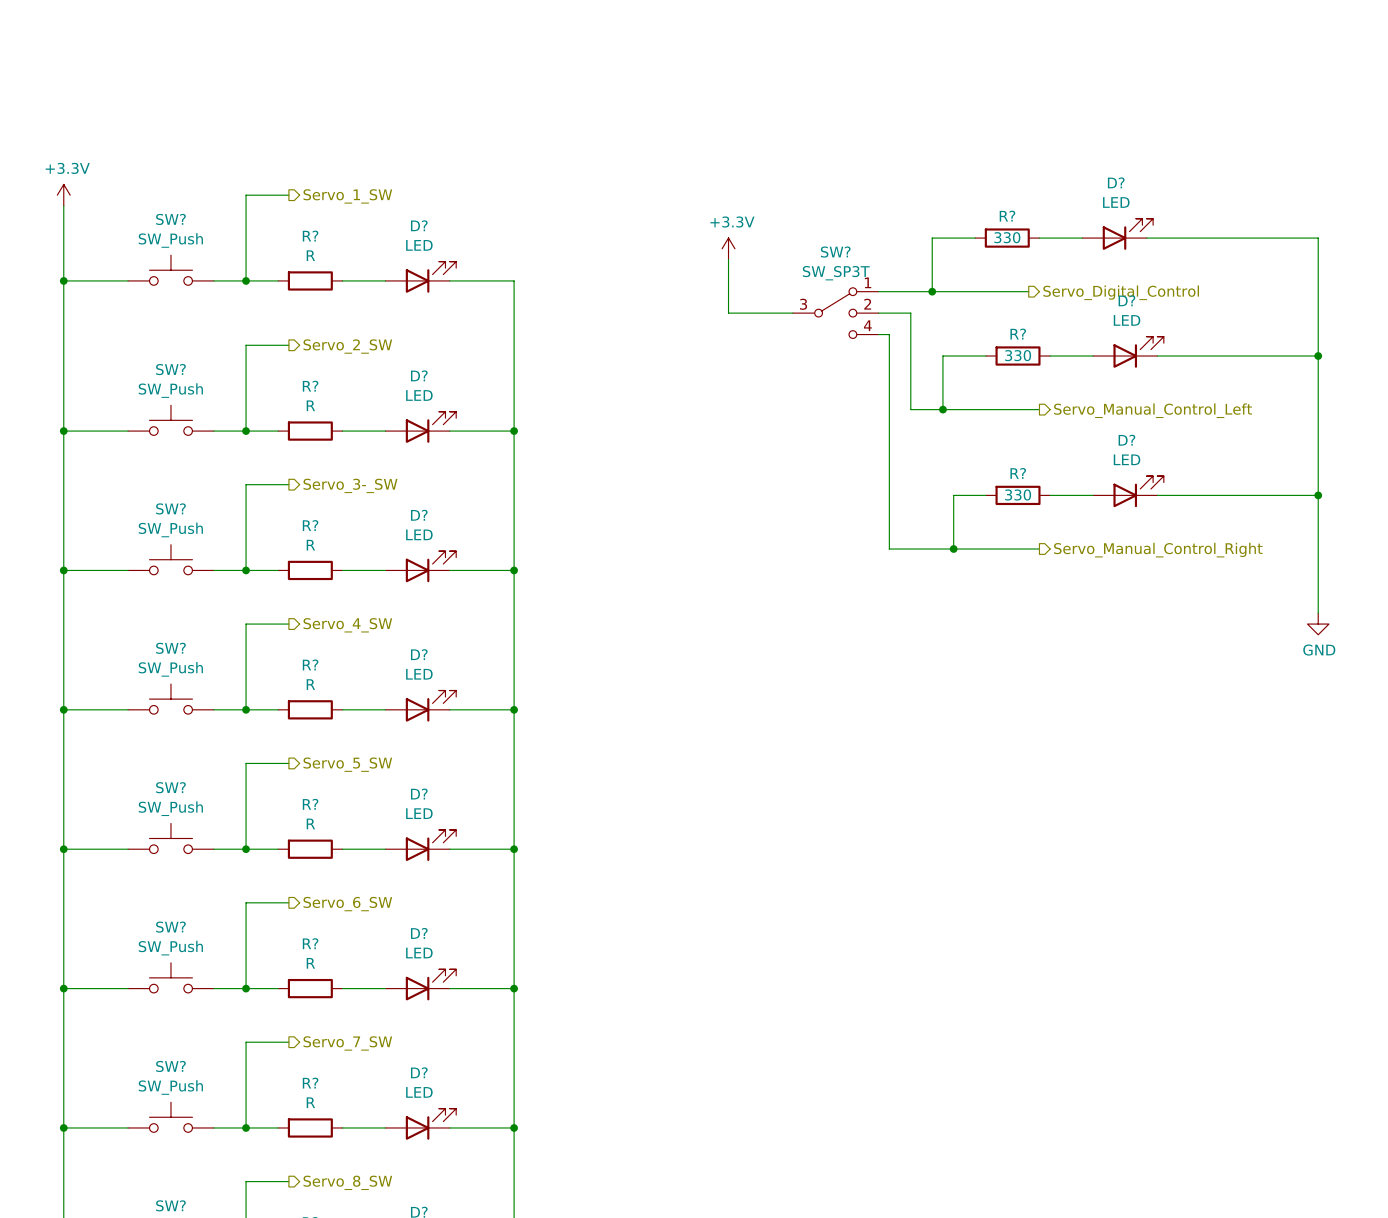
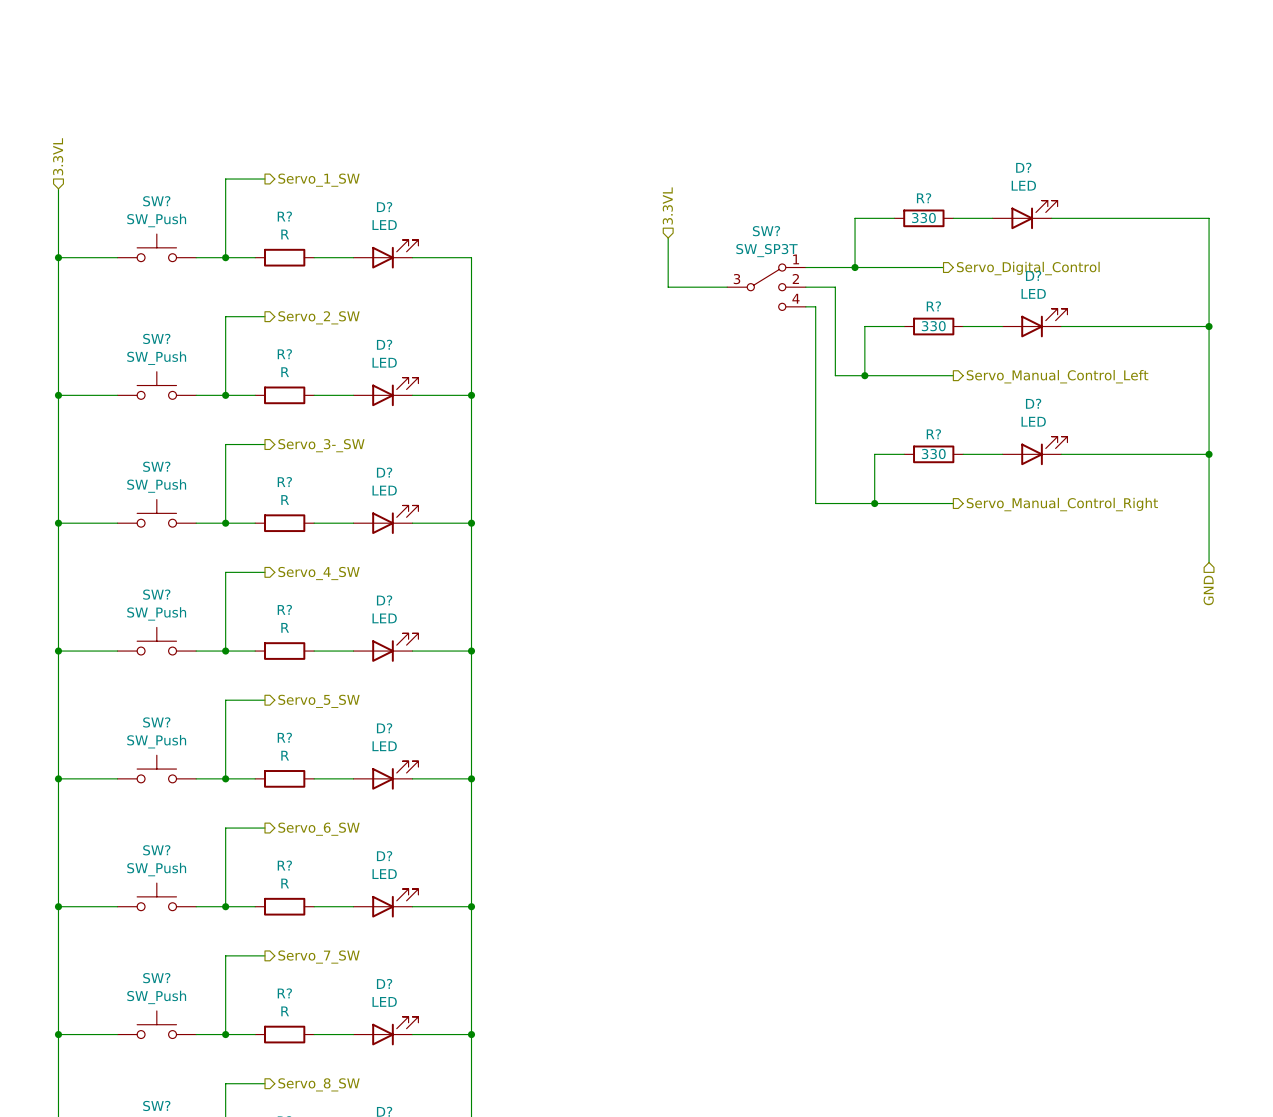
hierarchical label: none -> 3.3VL (58, 156)
power symbol: +3.3V (63, 195) -> none
hierarchical label: none -> 3.3VL (667, 205)
power symbol: +3.3V (728, 248) -> none
power symbol: GND (1318, 624) -> none
hierarchical label: none -> GND (1208, 590)

